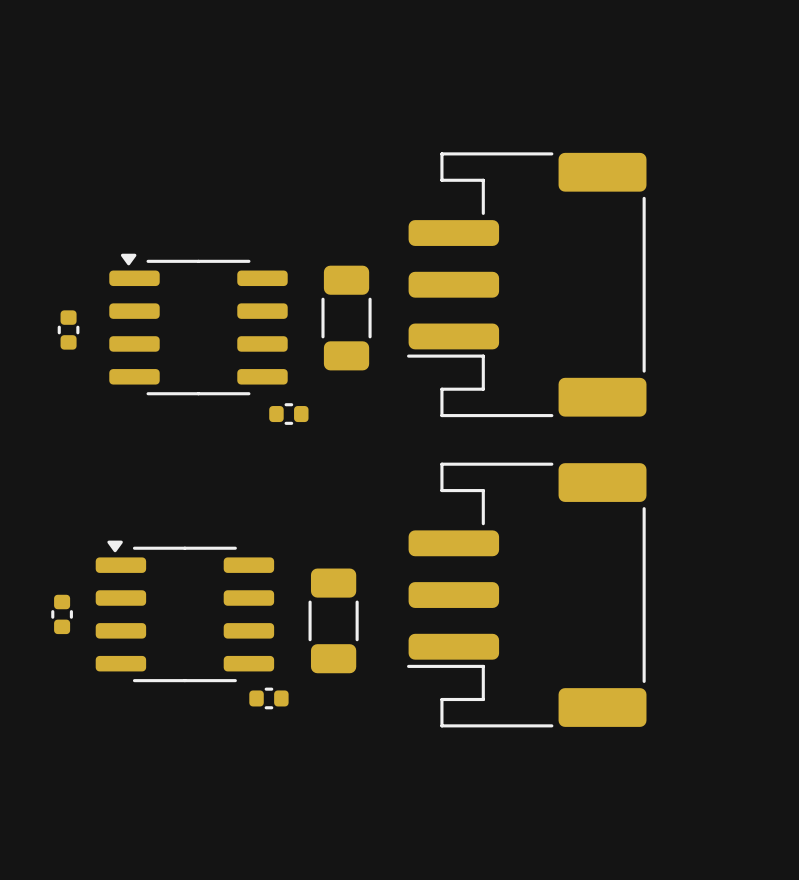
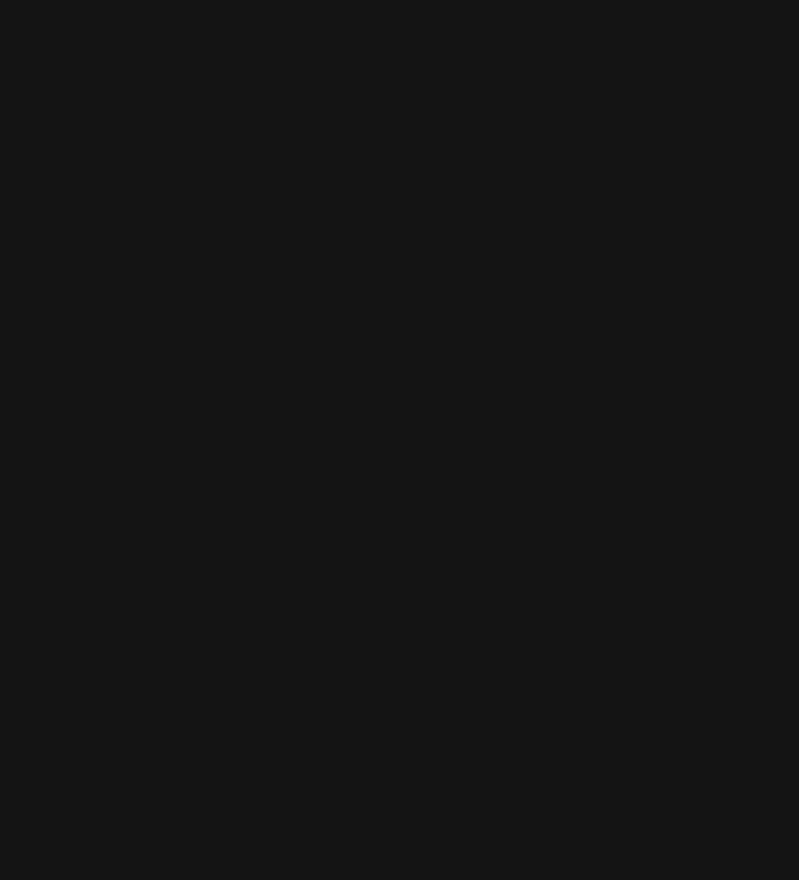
part: (526, 284) -> none
part: (346, 318) -> none
part: (198, 324) -> none
part: (68, 329) -> none
part: (288, 414) -> none
part: (526, 595) -> none
part: (184, 611) -> none
part: (62, 614) -> none
part: (333, 620) -> none
part: (268, 698) -> none

